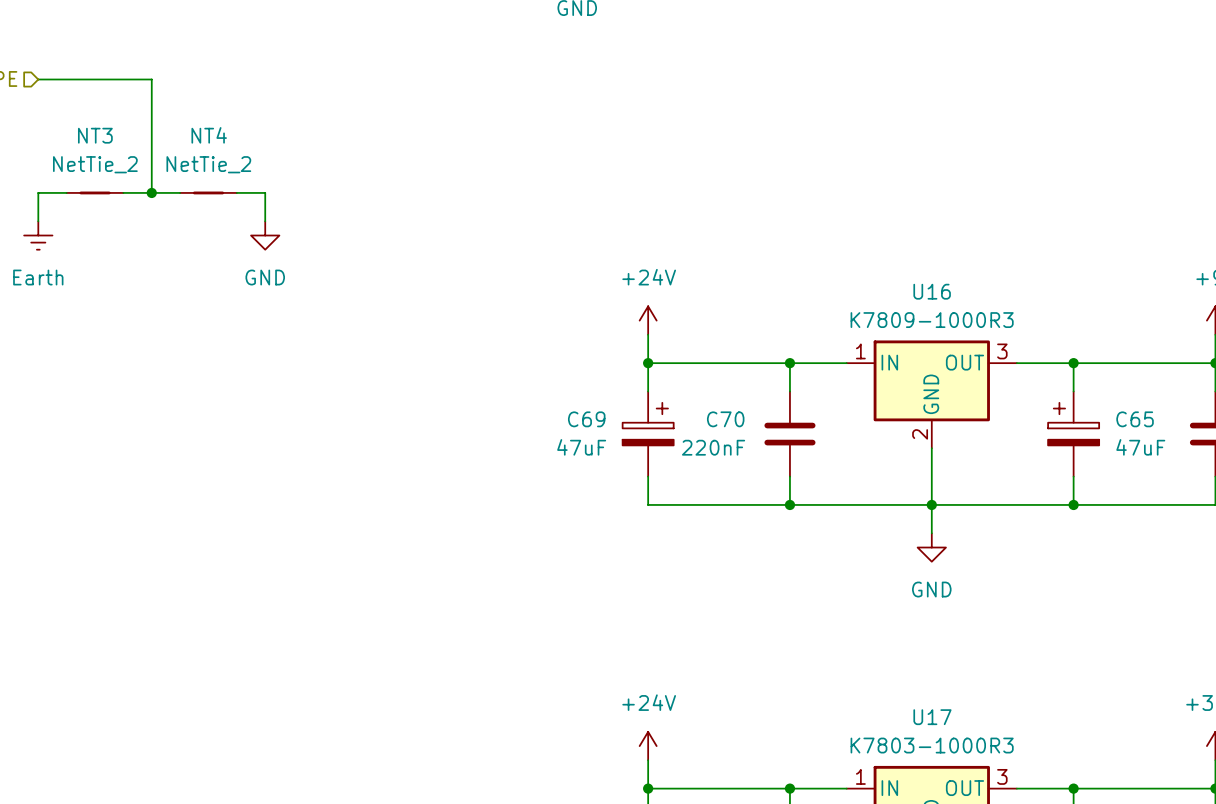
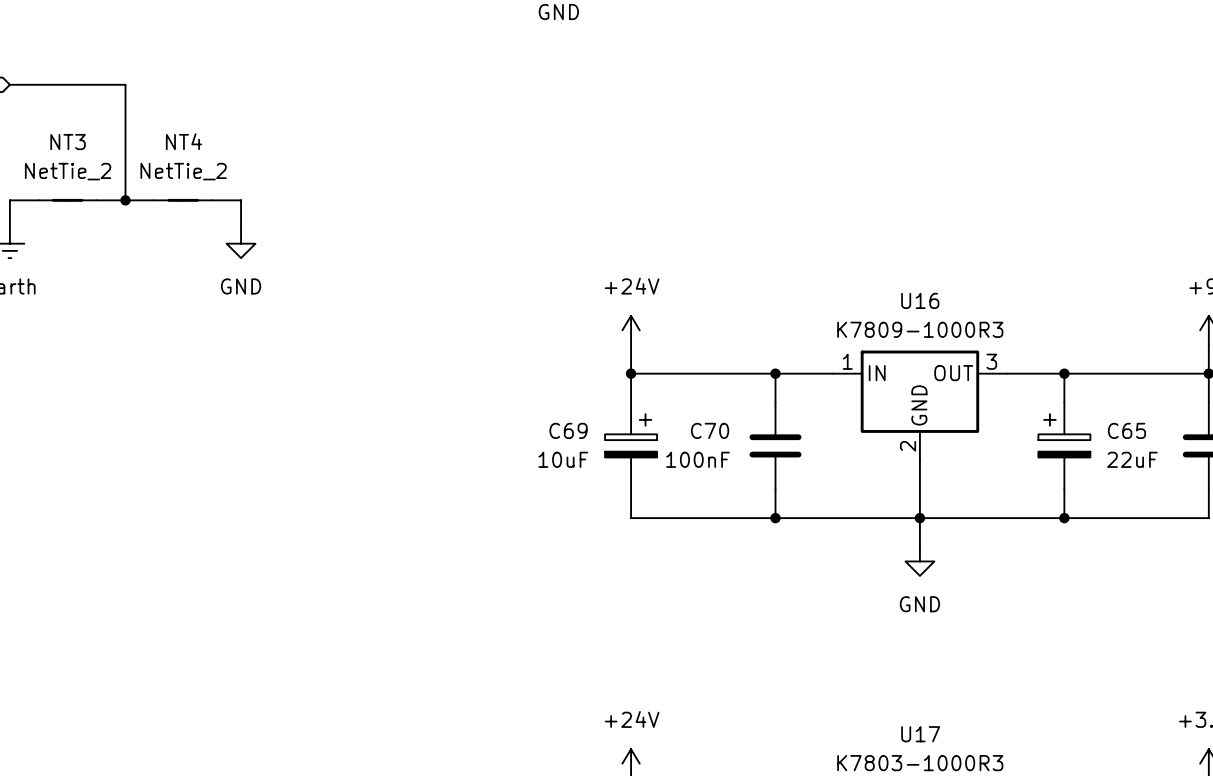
C69 value: 47uF (581, 447) -> 10uF (563, 459)
C70 value: 220nF (713, 447) -> 100nF (698, 459)
C65 value: 47uF (1140, 447) -> 22uF (1132, 459)

